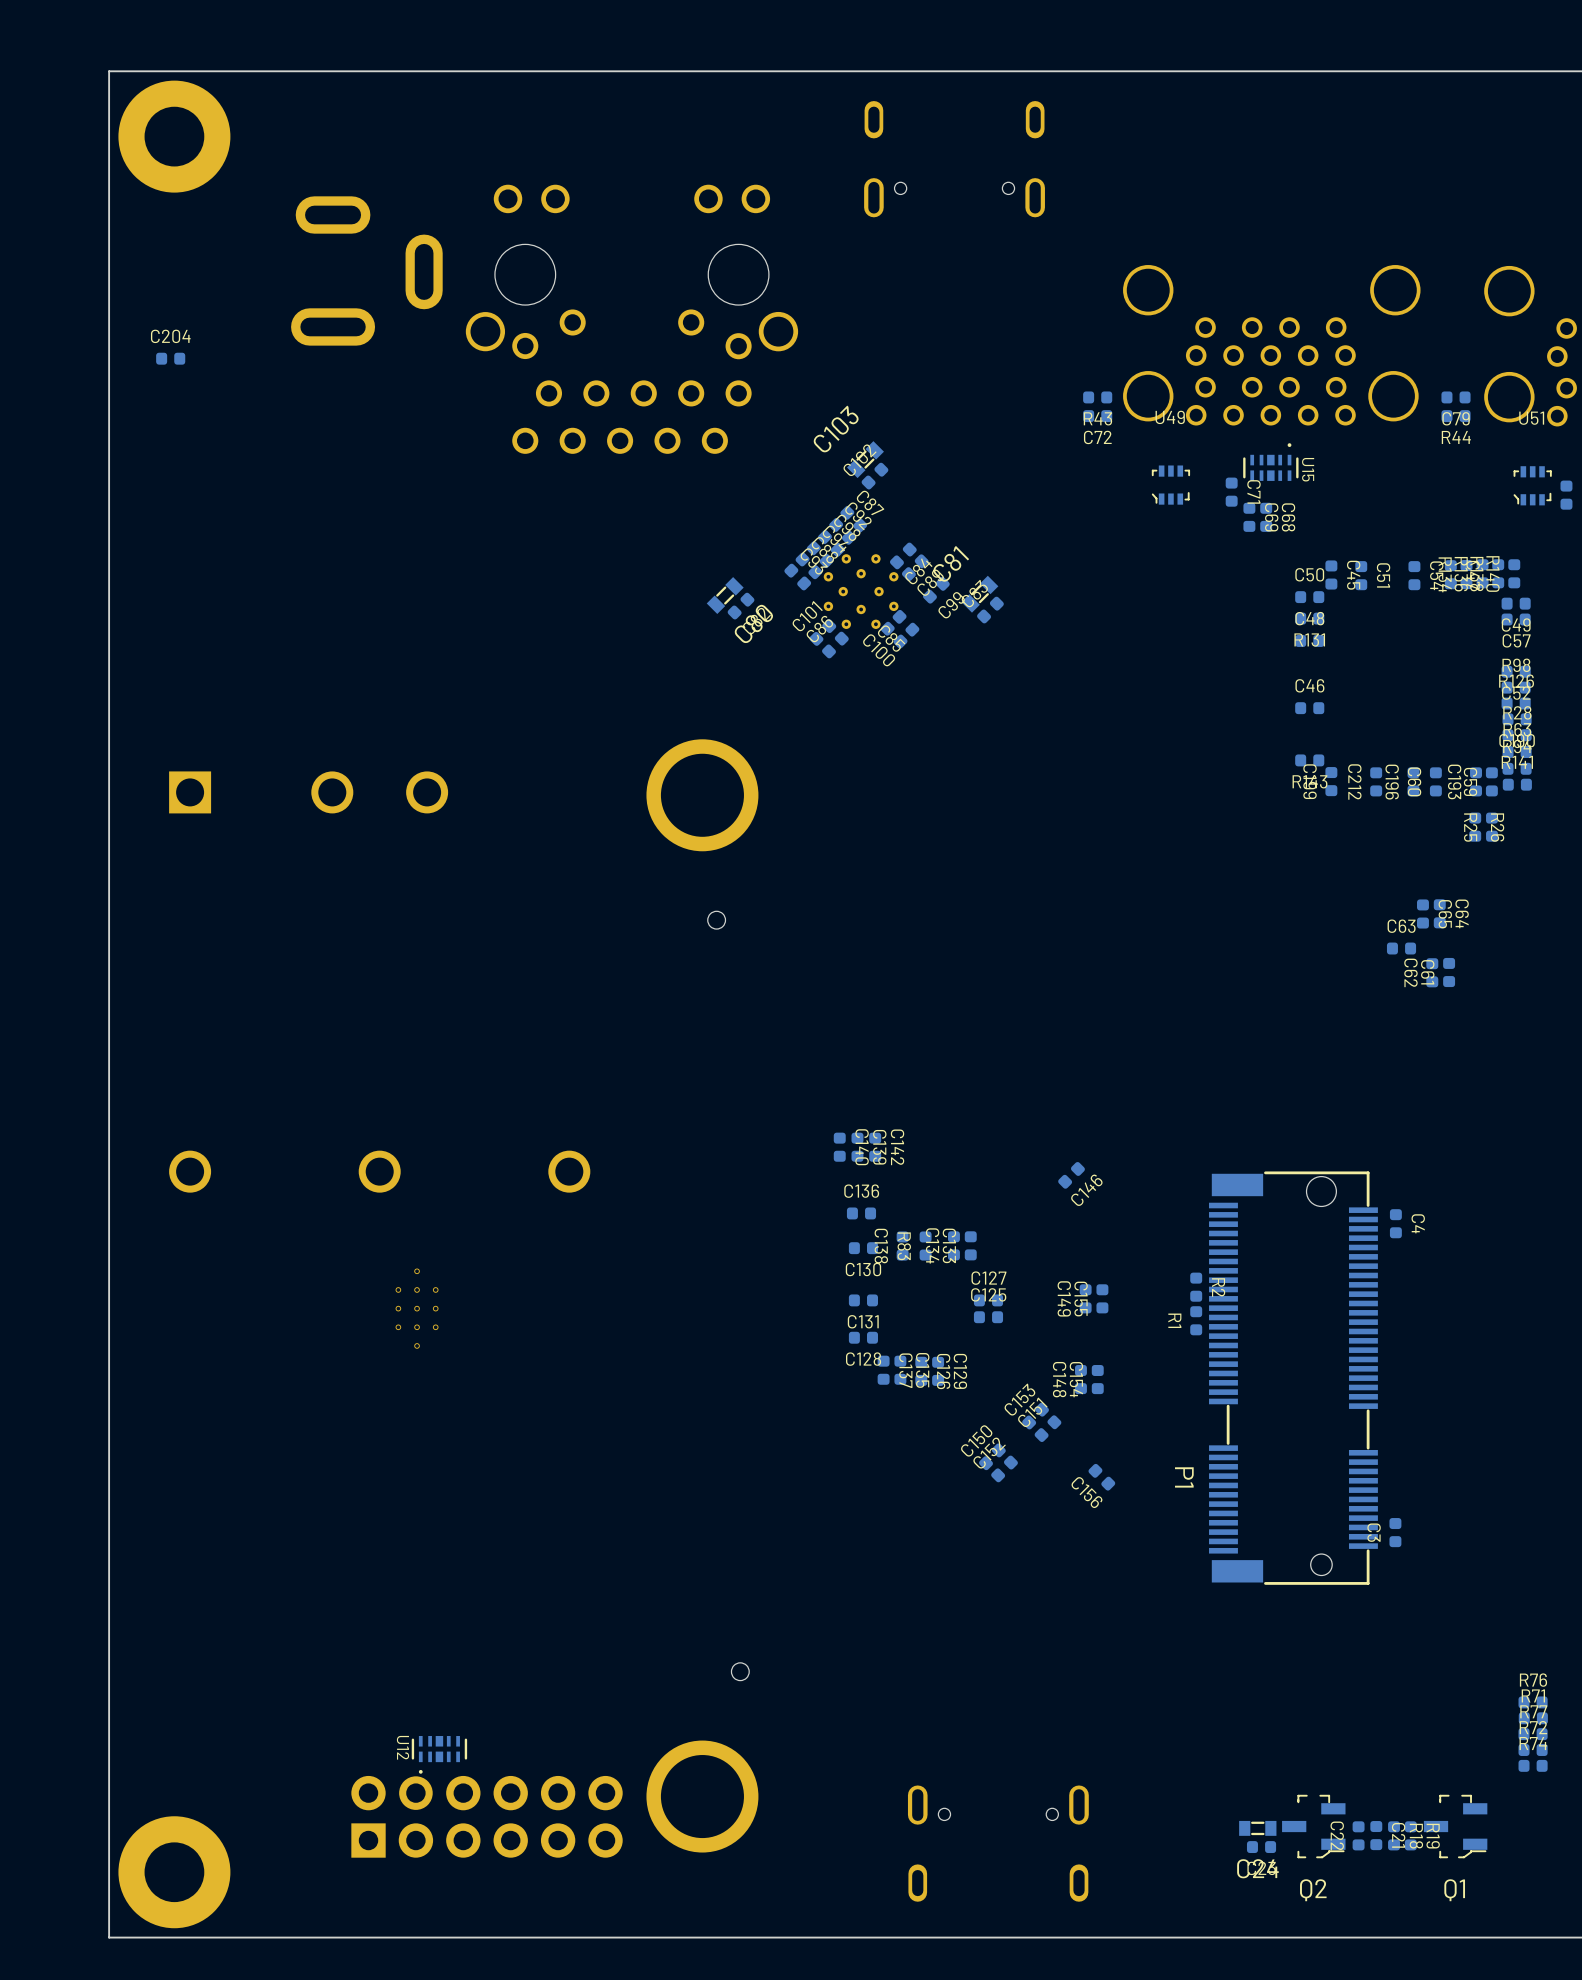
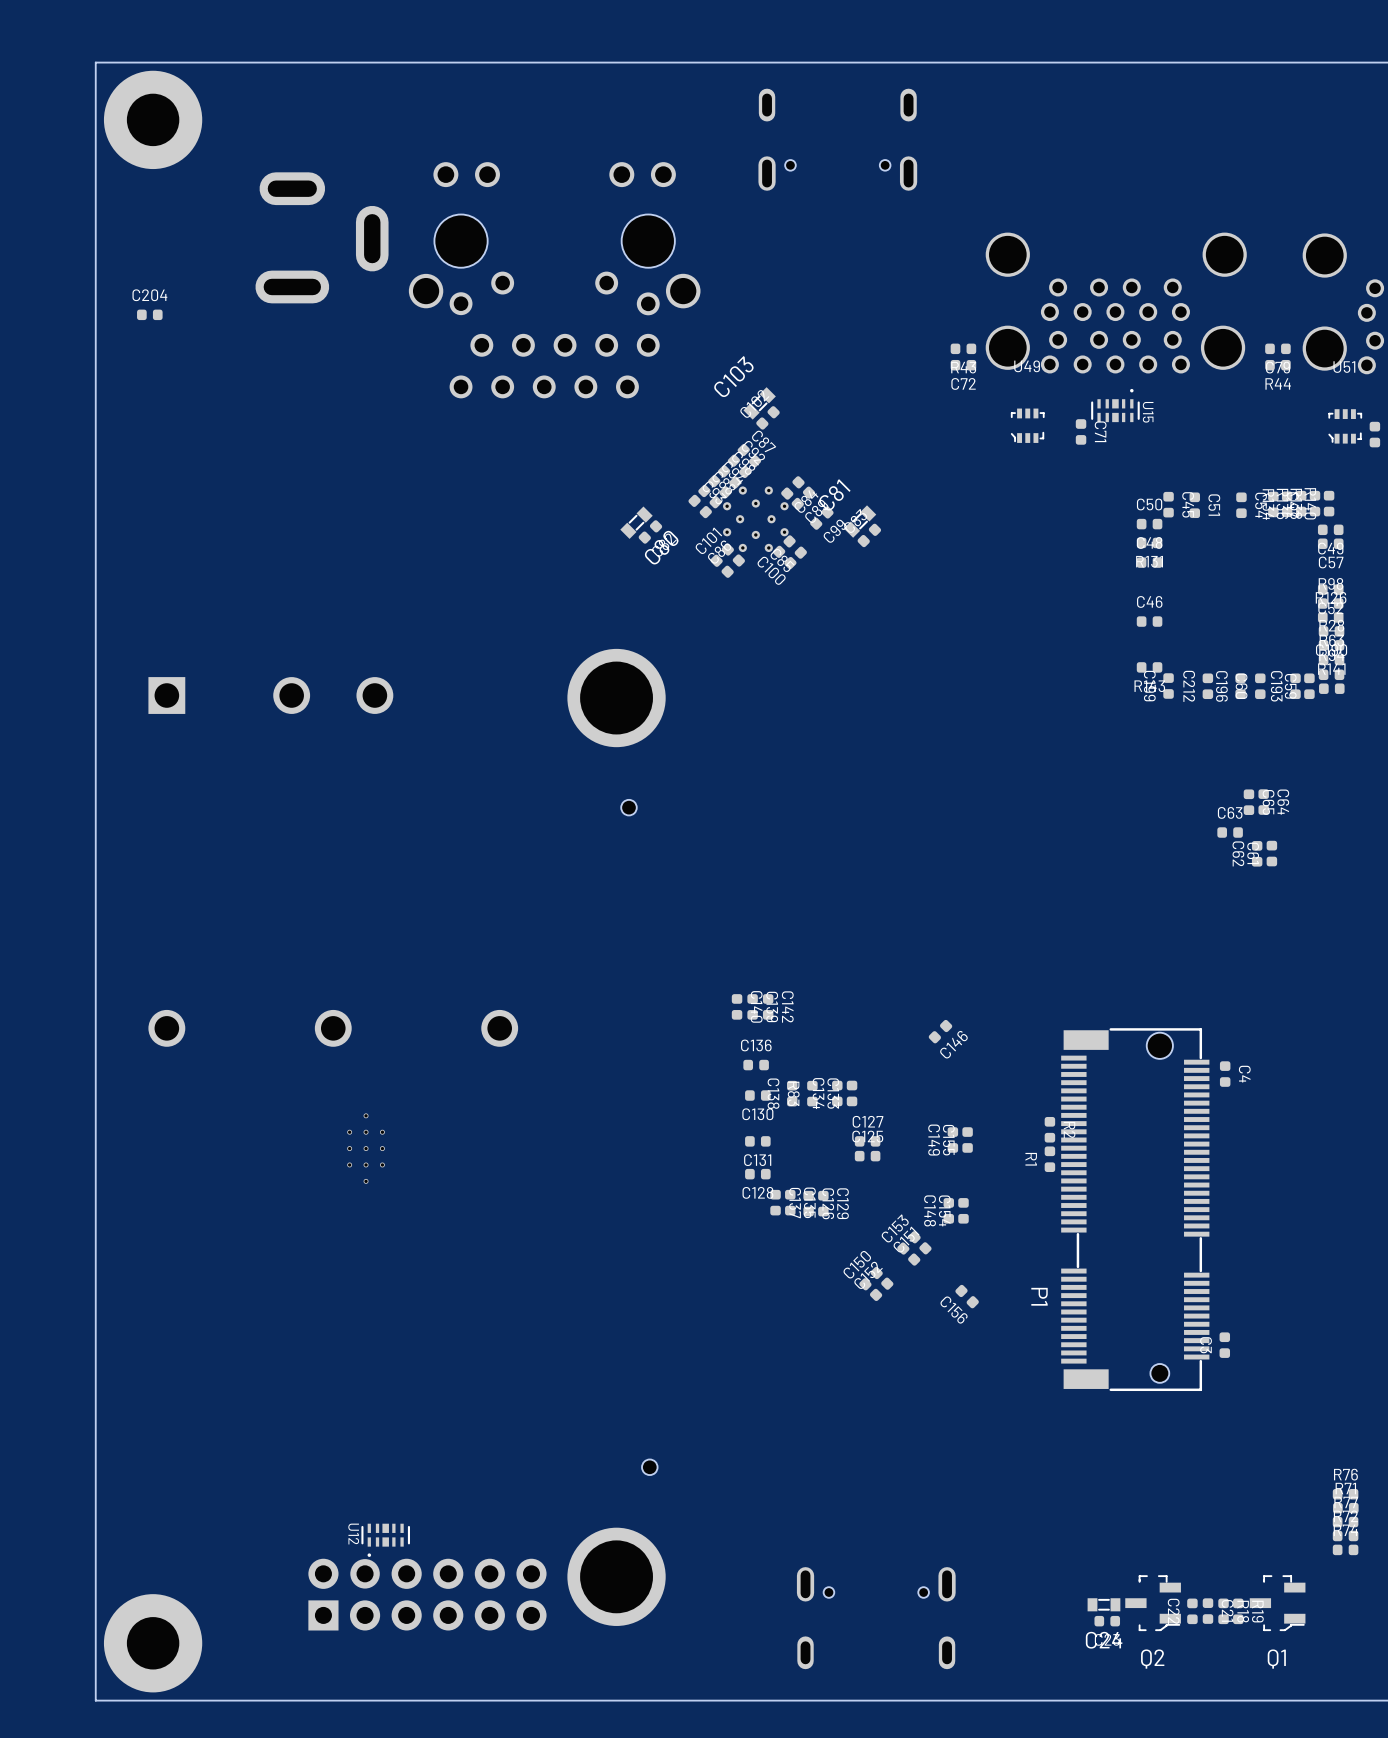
C69: (1249, 517) -> none
C68: (1266, 517) -> none
R26: (1475, 827) -> none
R25: (1492, 827) -> none

